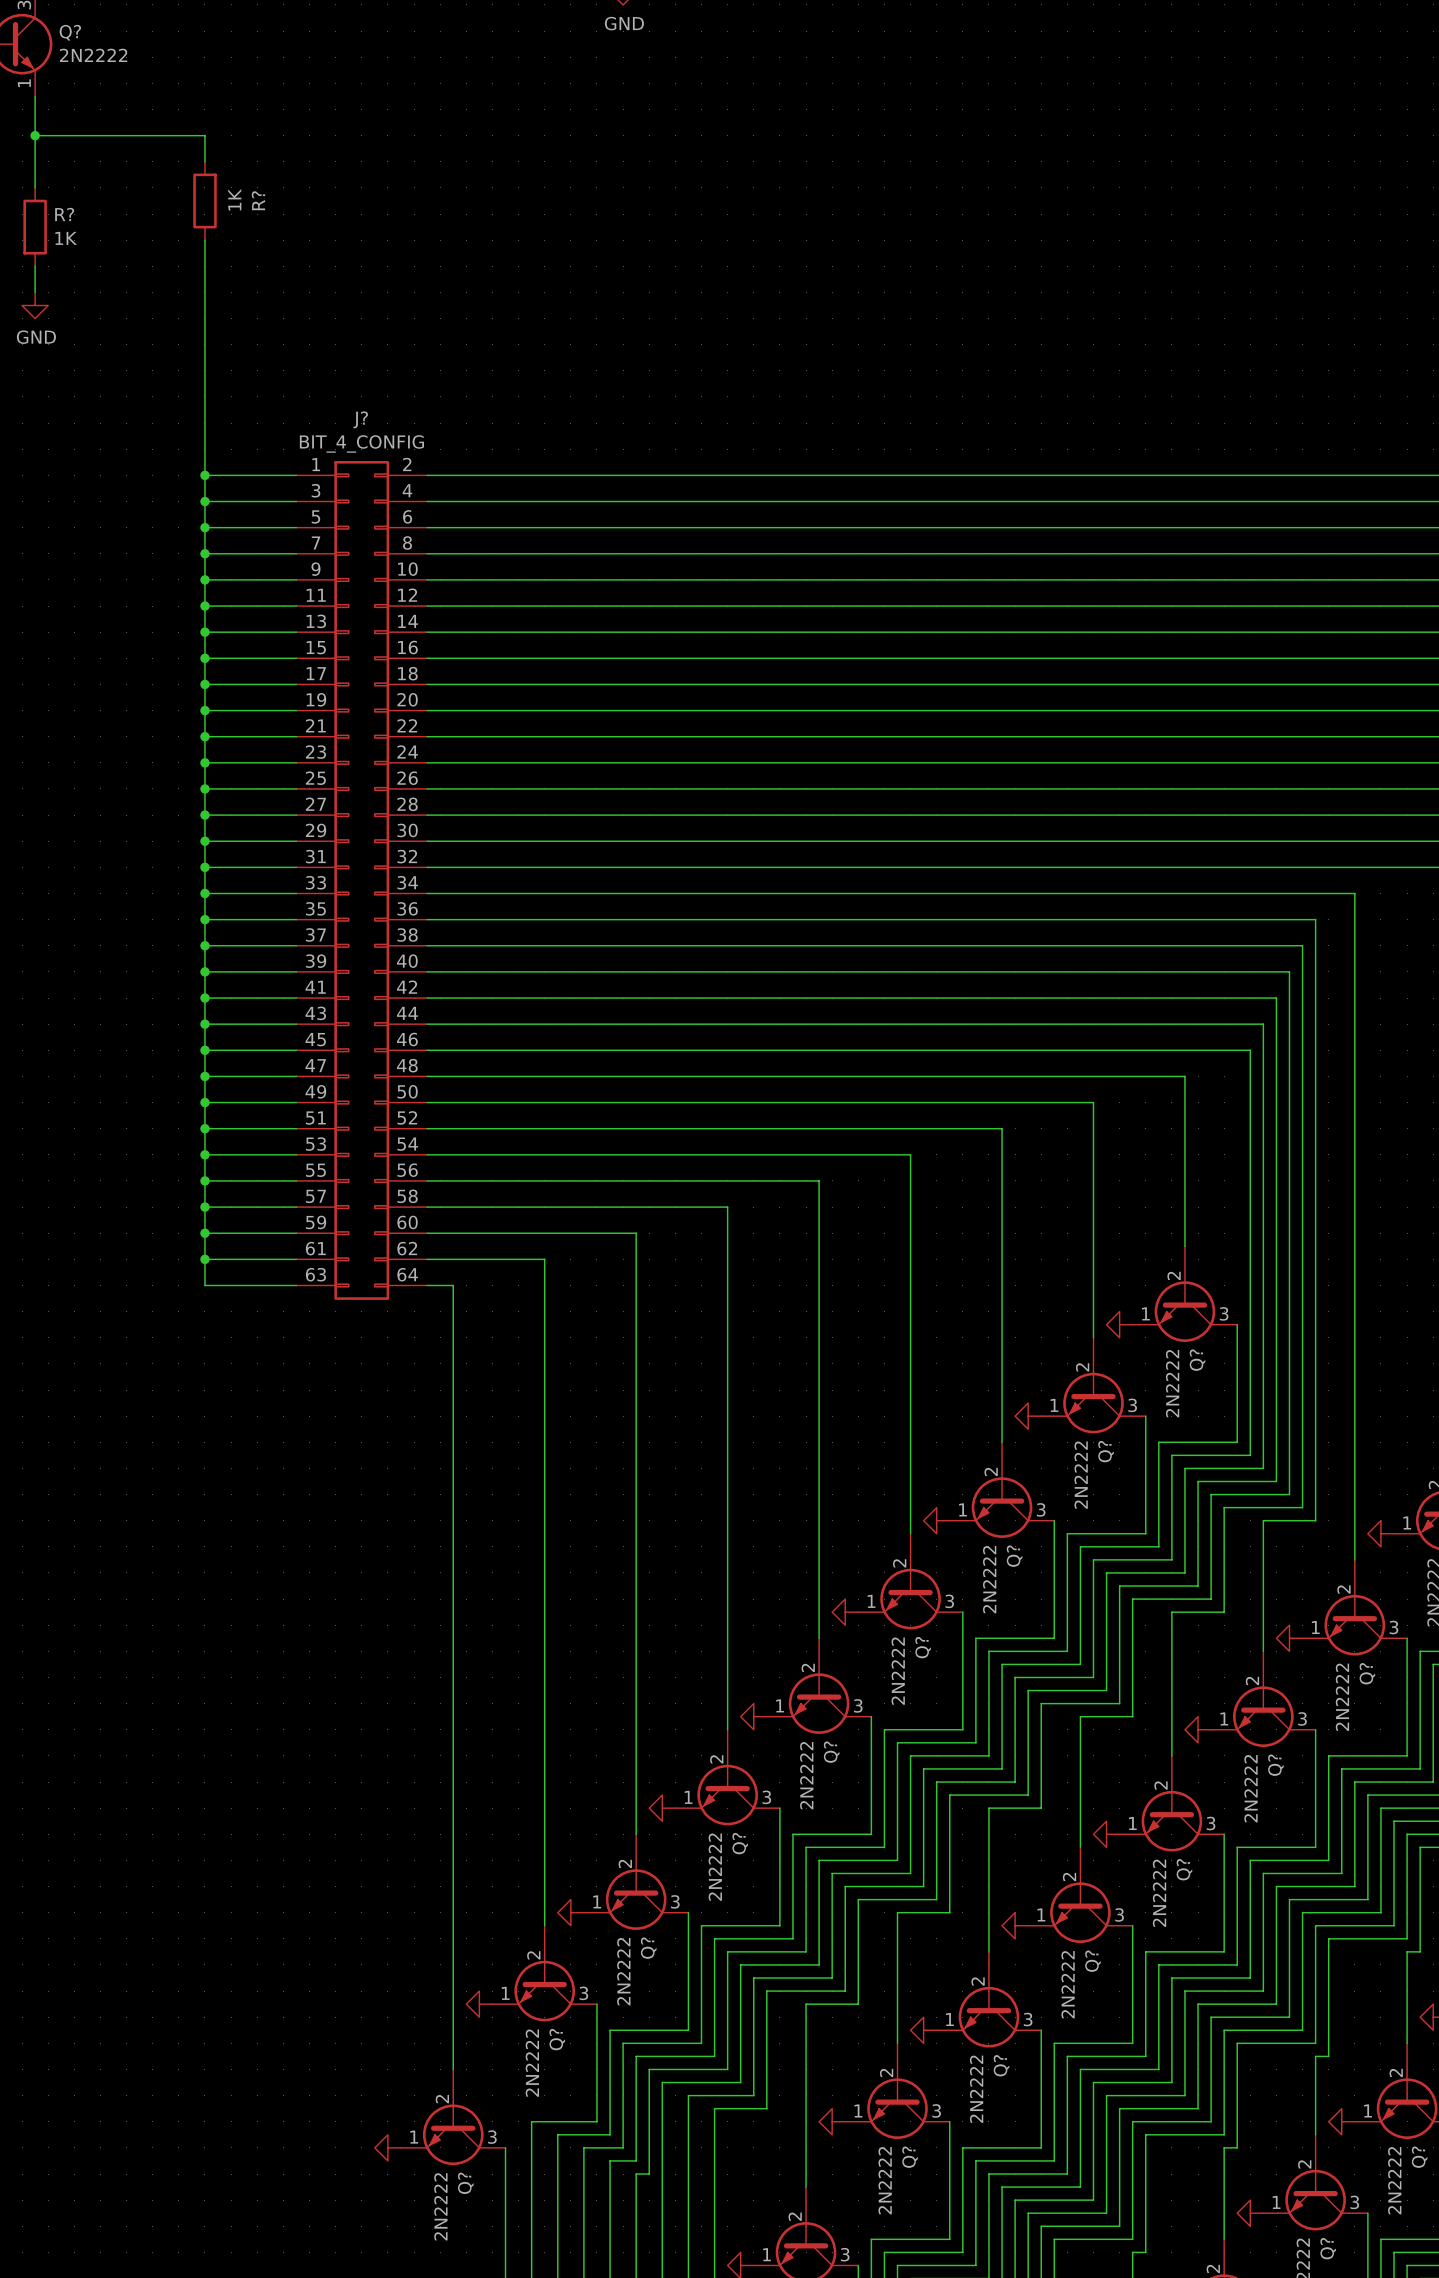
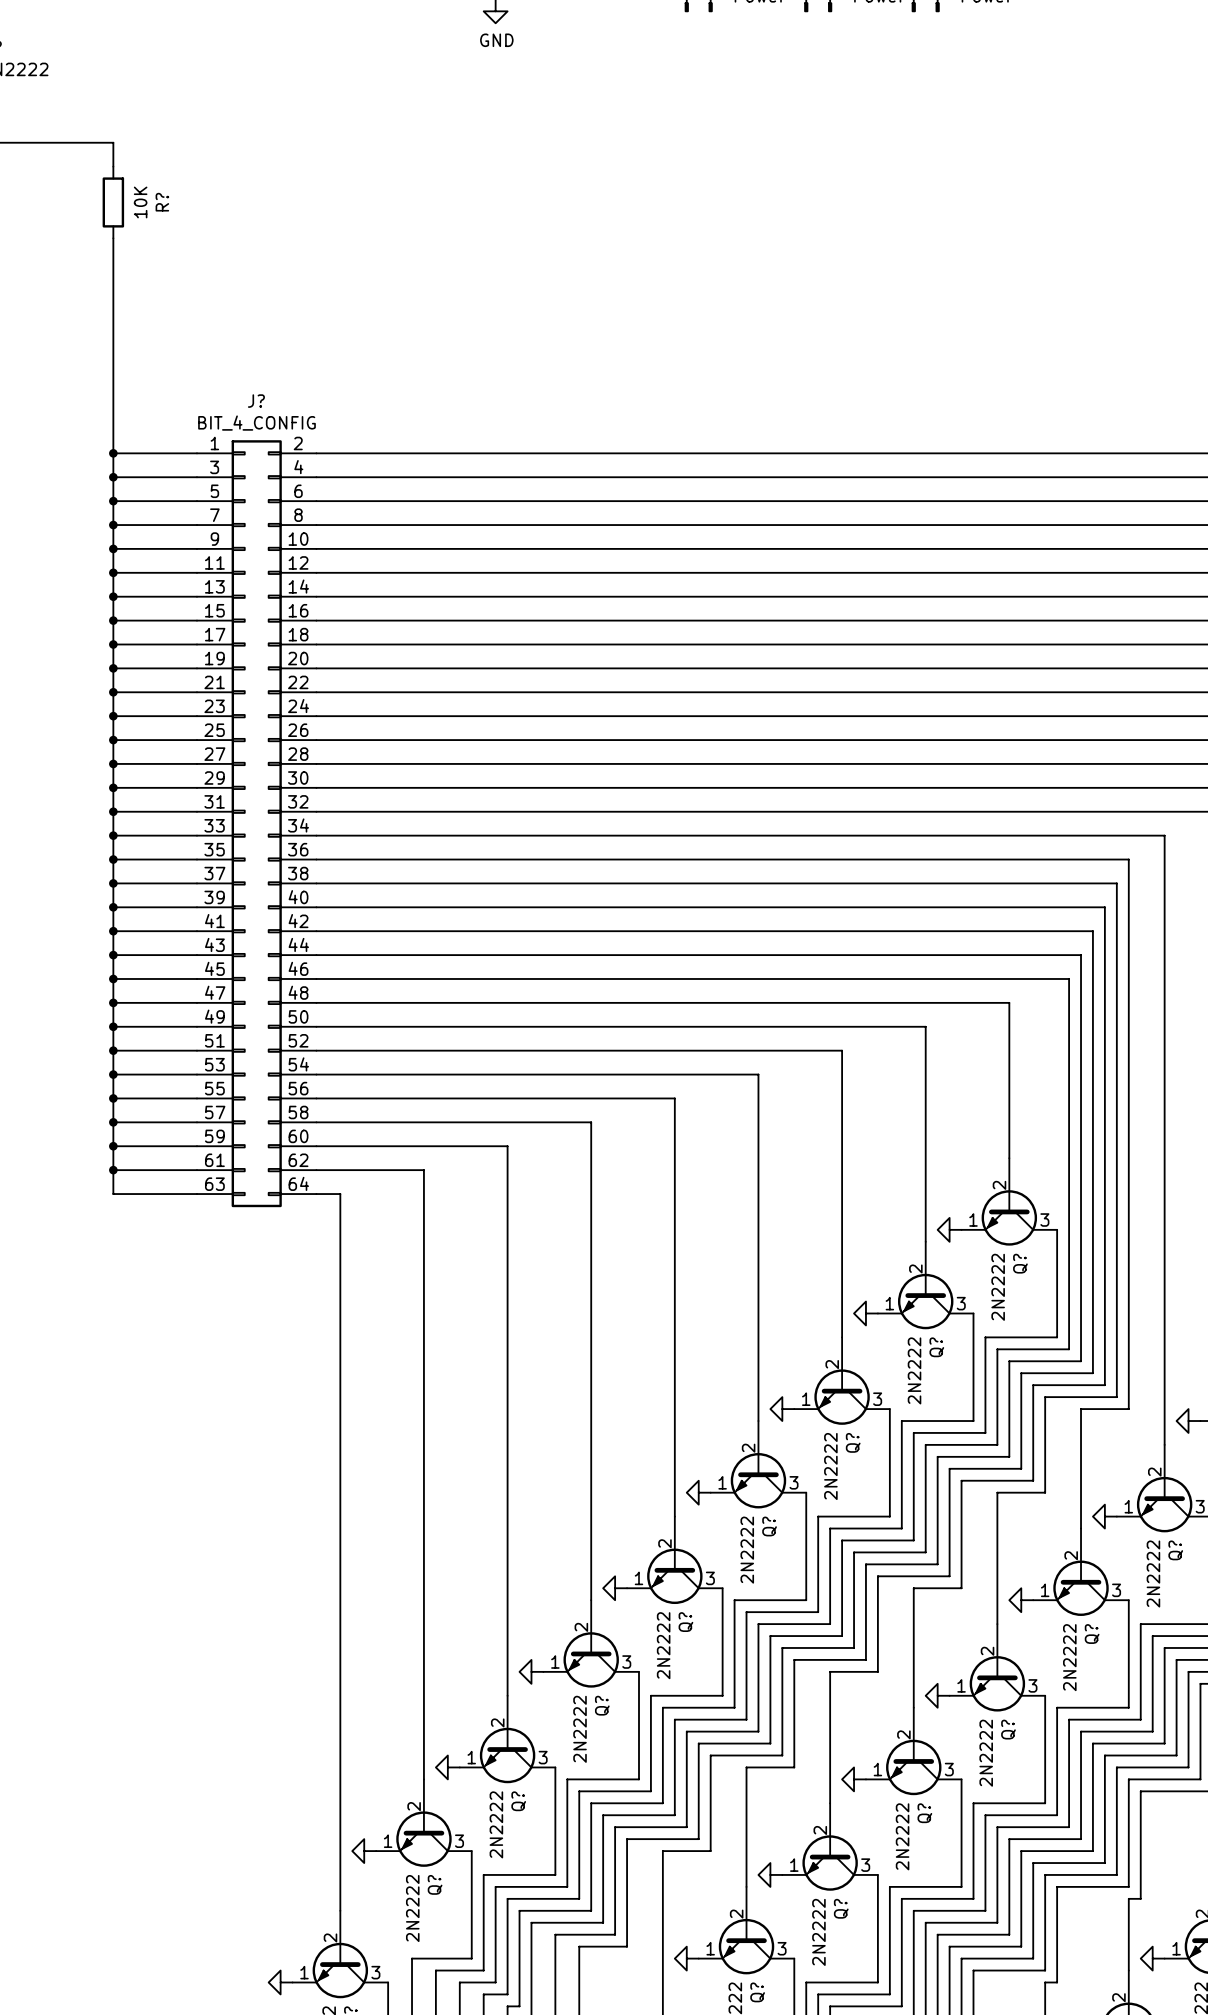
R? value: 1K (234, 199) -> 10K (140, 202)

